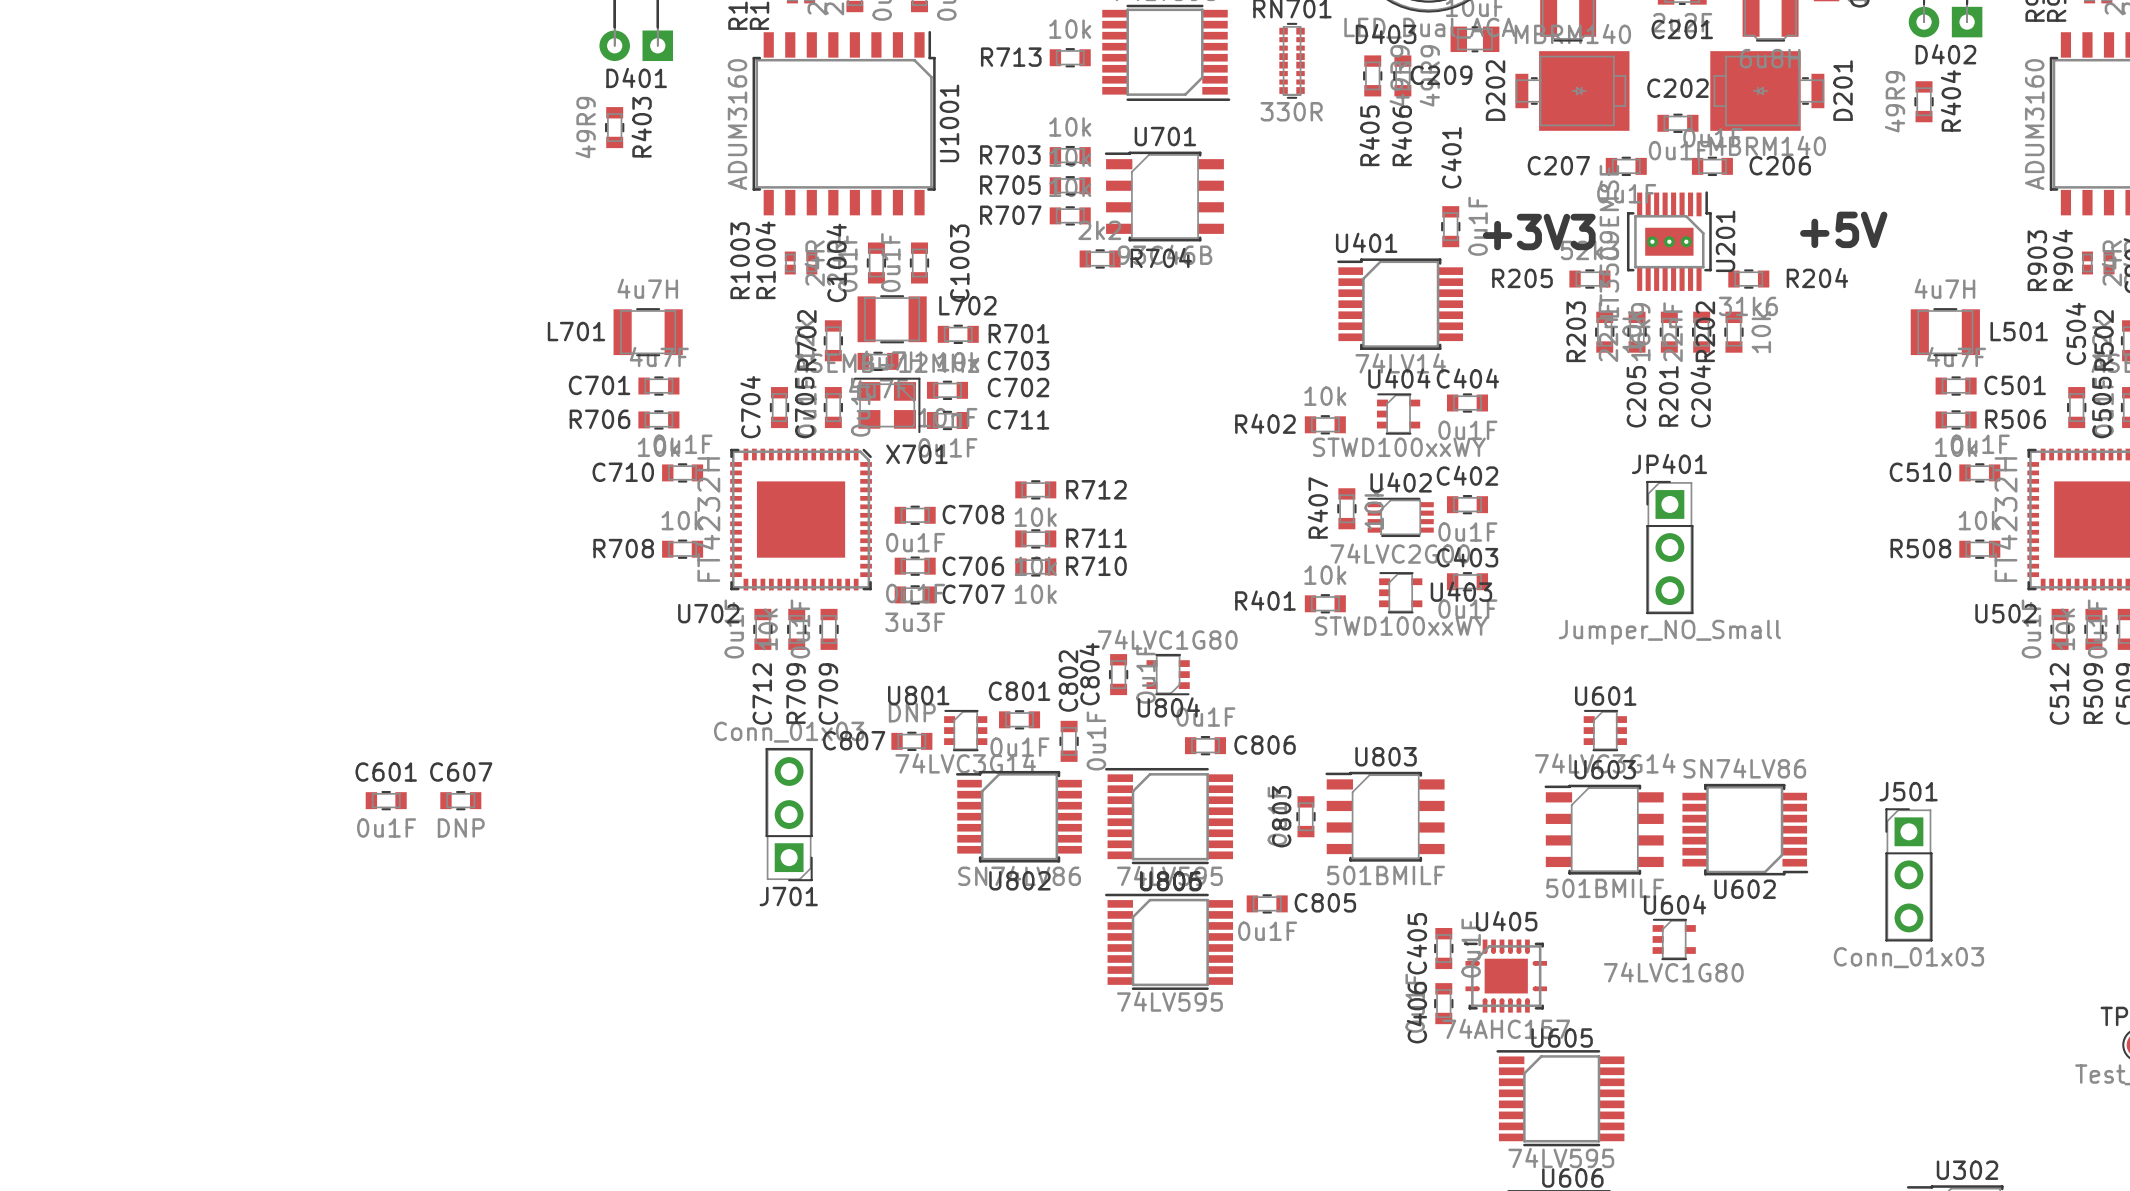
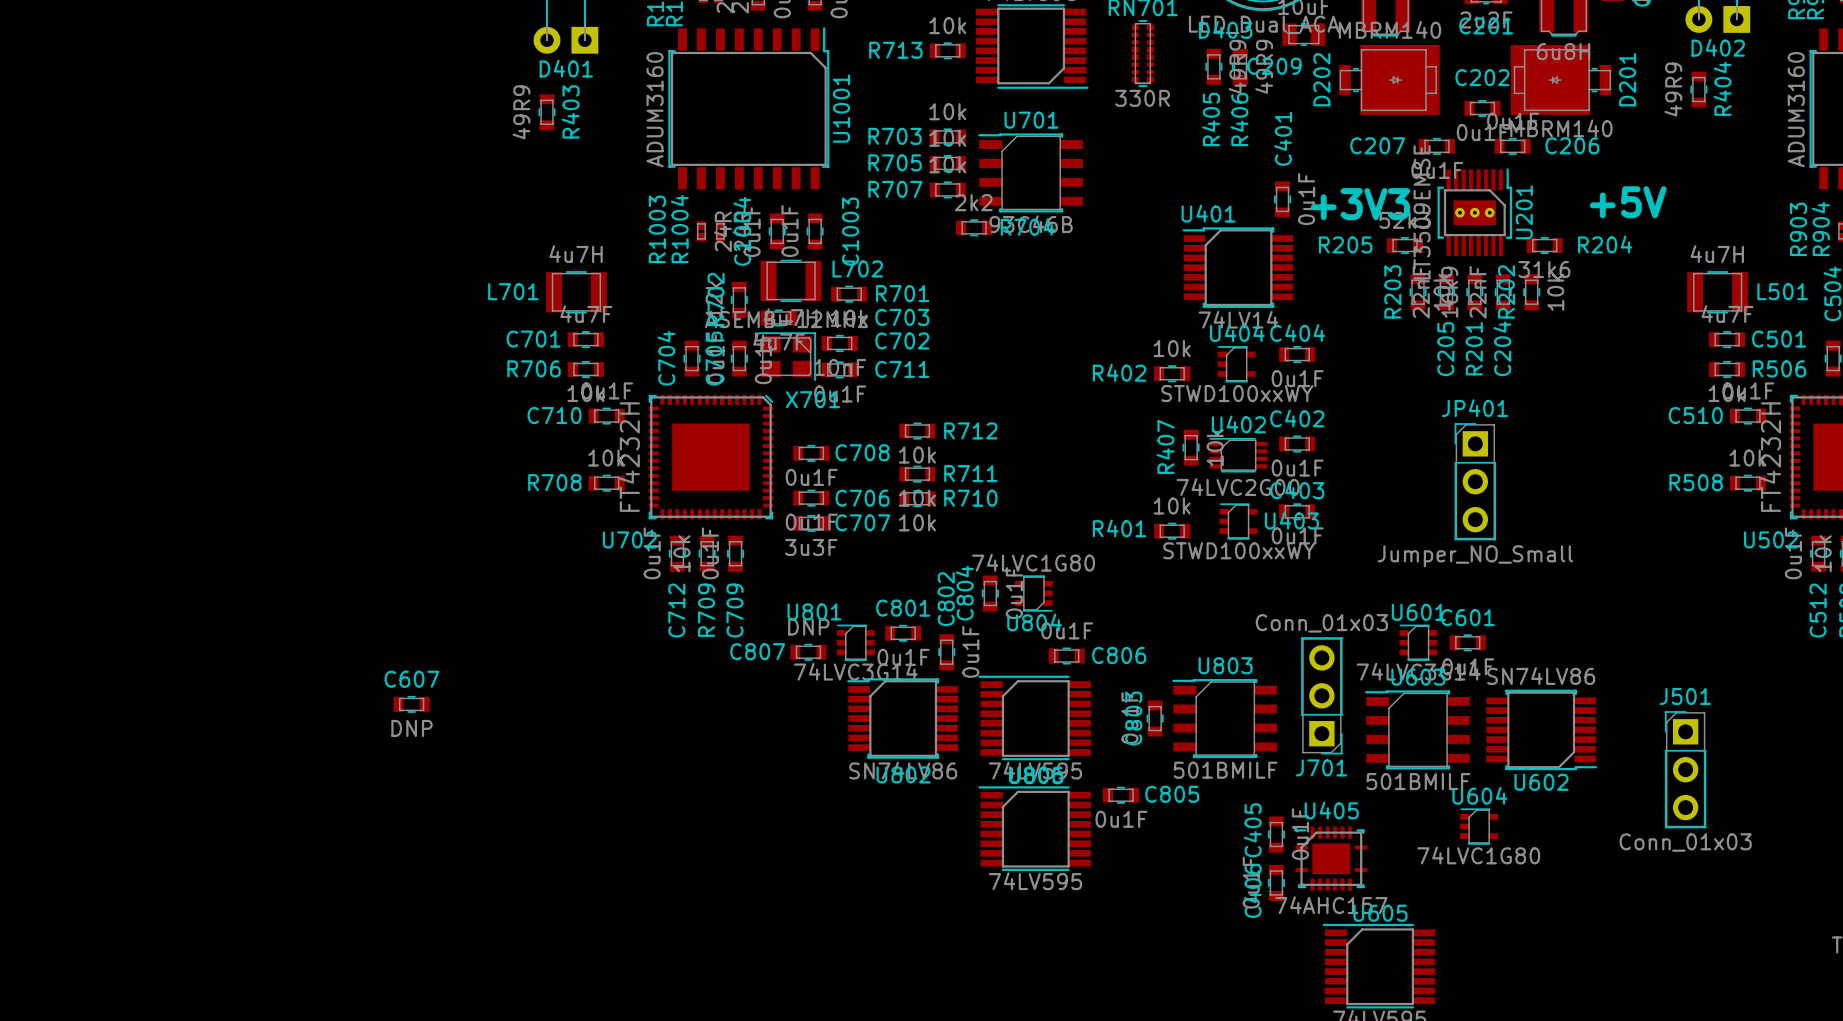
C601 position: (386, 800) -> (1467, 642)
J701 position: (789, 814) -> (1321, 695)

